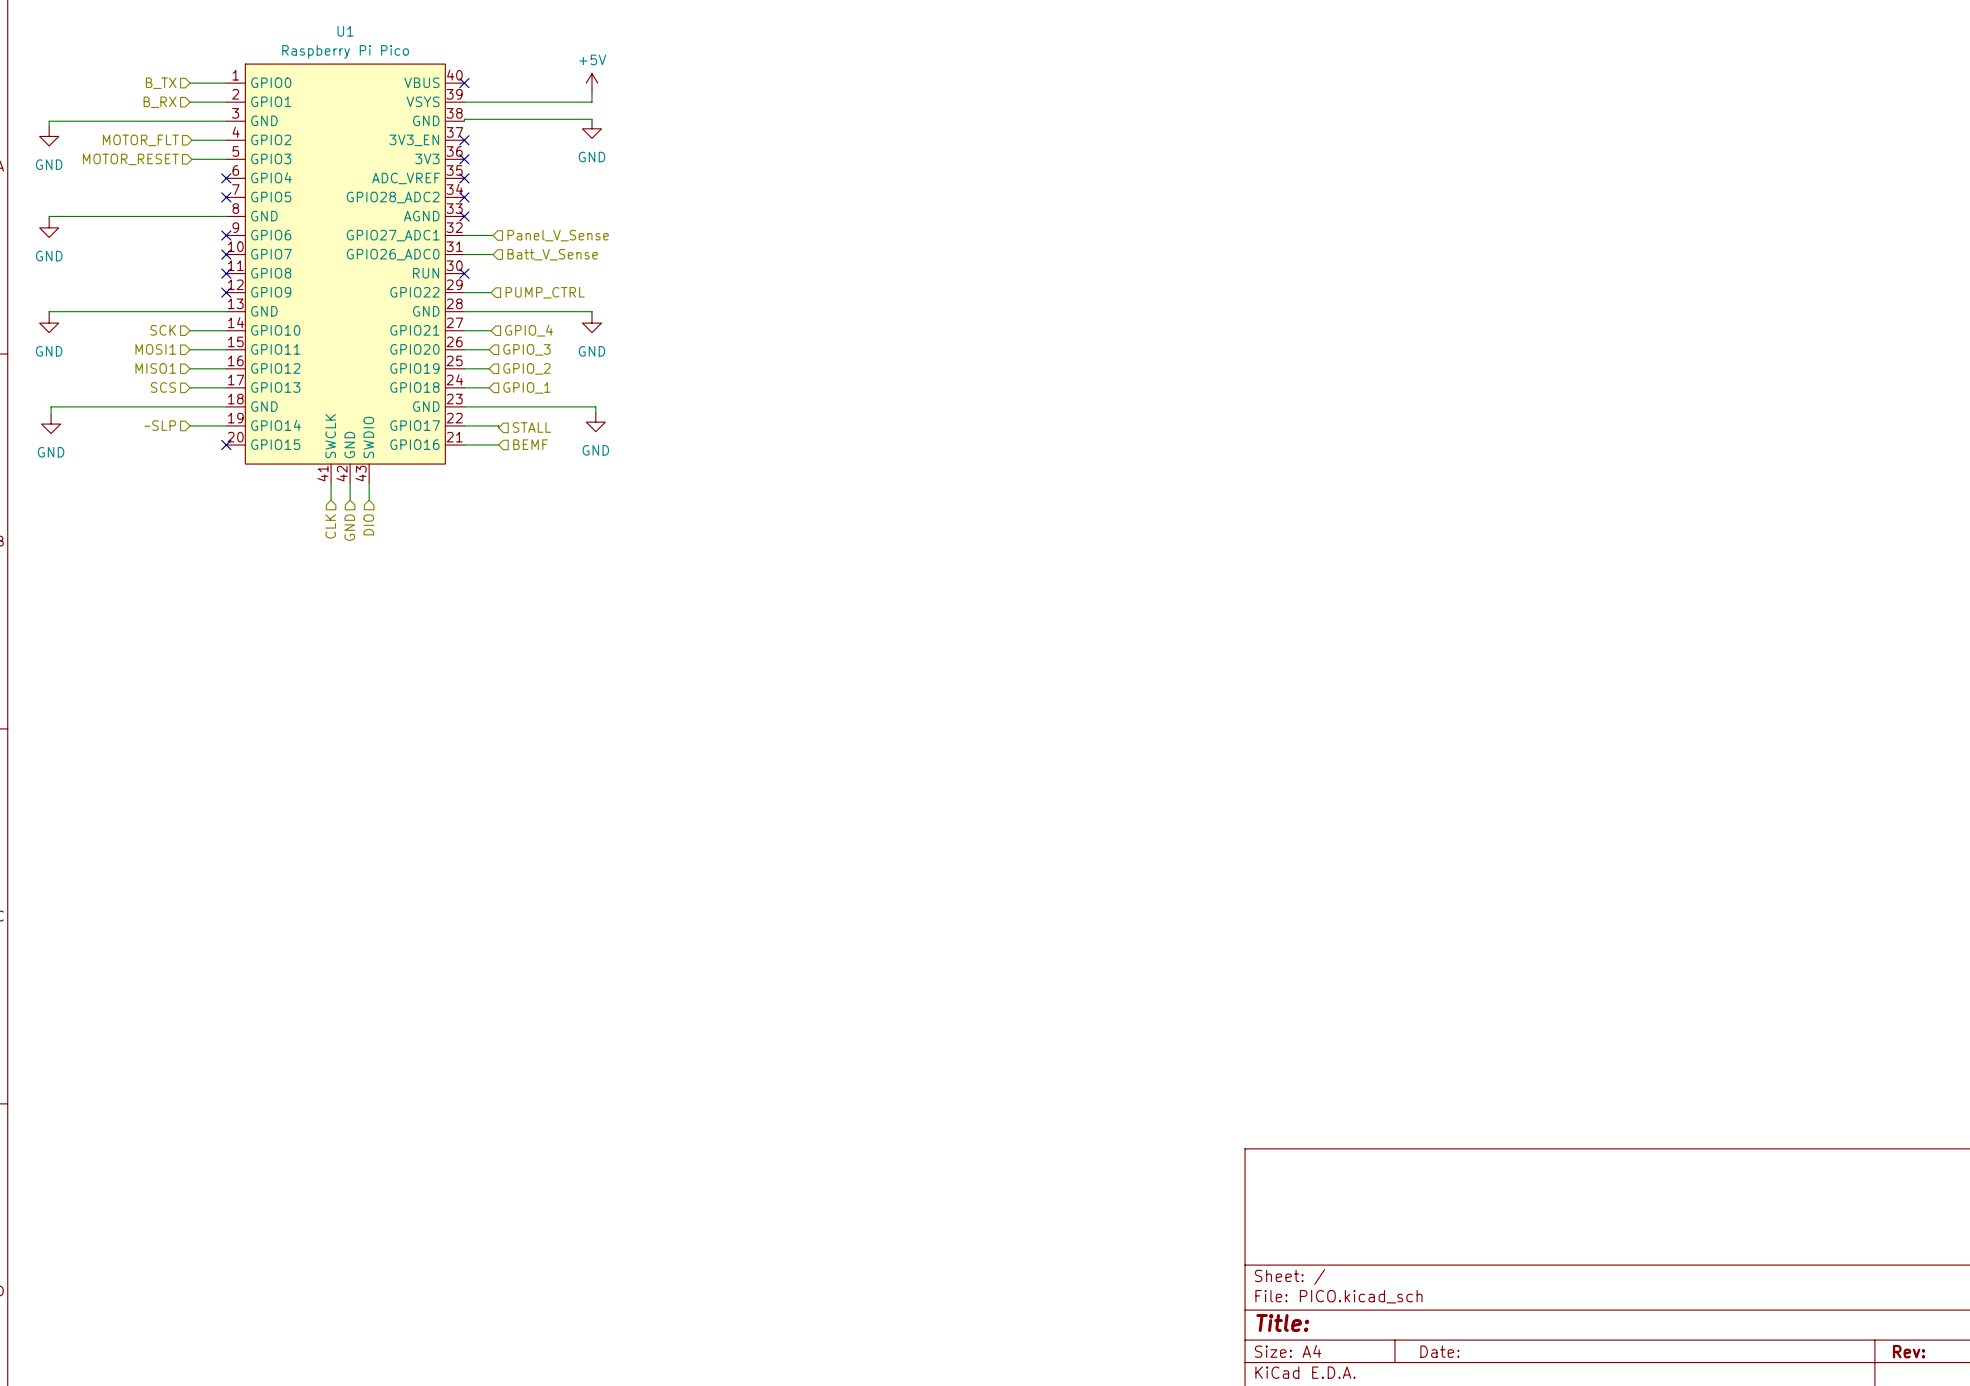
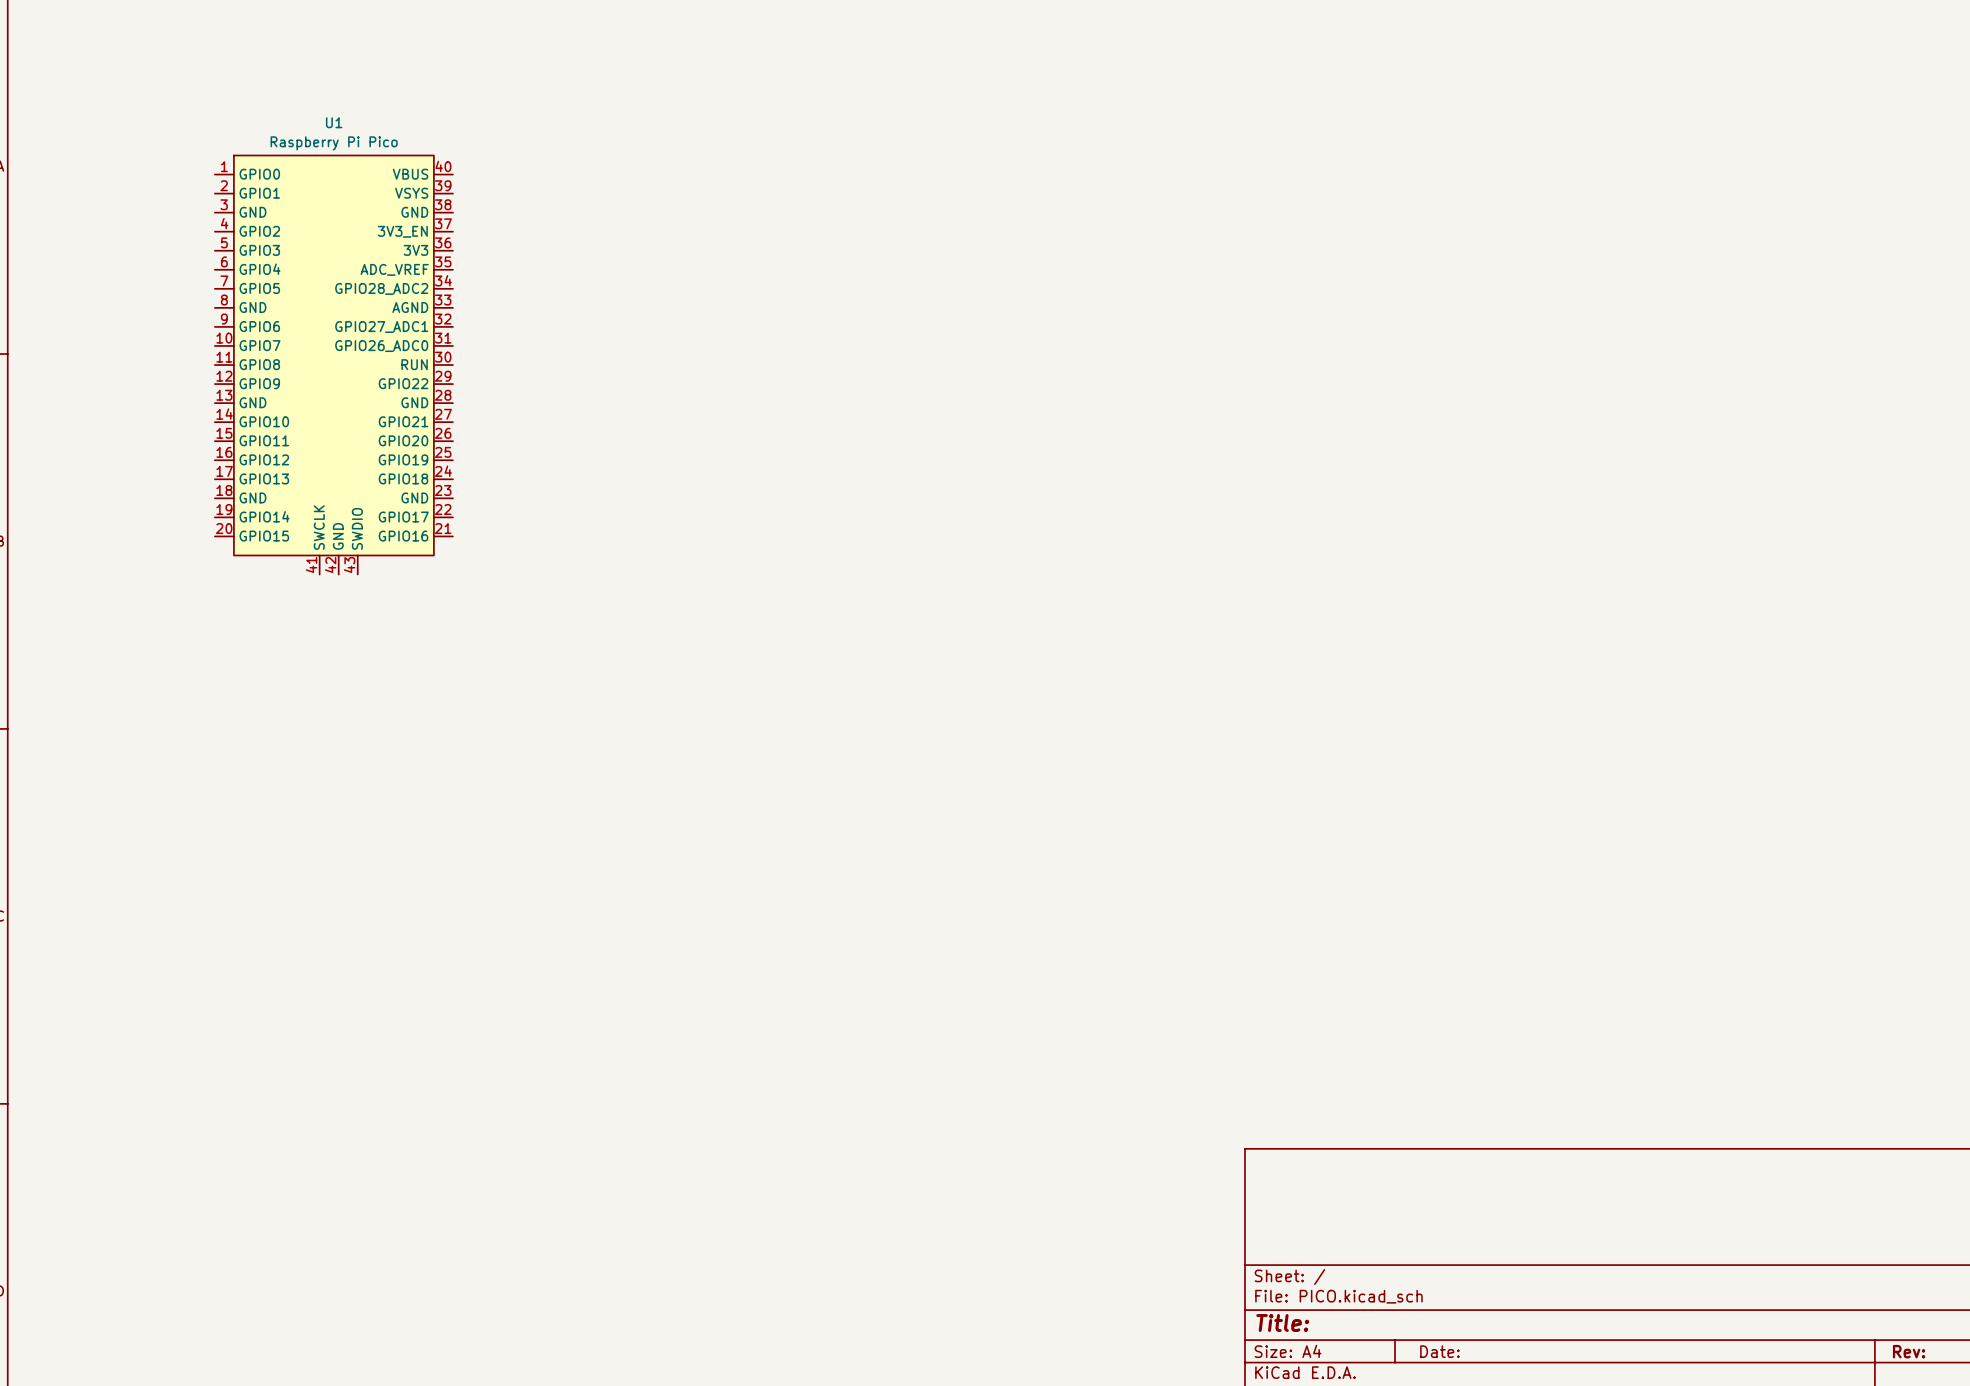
hierarchical label: B_TX (161, 83) -> none
wire: (190, 83) (226, 83) -> none
no-connect mark: (464, 83) -> none
power symbol: +5V (592, 83) -> none
wire: (592, 92) (592, 102) (464, 102) -> none
hierarchical label: B_RX (160, 102) -> none
wire: (190, 102) (226, 102) -> none
wire: (592, 119) (464, 119) (464, 121) -> none
wire: (226, 121) (49, 121) (49, 126) -> none
power symbol: GND (592, 128) -> none
power symbol: GND (49, 136) -> none
hierarchical label: MOTOR_FLT (140, 140) -> none
wire: (192, 140) (226, 140) -> none
no-connect mark: (464, 140) -> none
hierarchical label: MOTOR_RESET (130, 159) -> none
wire: (192, 159) (226, 159) -> none
no-connect mark: (464, 159) -> none
no-connect mark: (226, 178) -> none
no-connect mark: (464, 178) -> none
no-connect mark: (226, 197) -> none
no-connect mark: (464, 197) -> none
wire: (226, 216) (49, 216) (49, 218) -> none
no-connect mark: (464, 216) -> none
power symbol: GND (49, 227) -> none
no-connect mark: (226, 235) -> none
wire: (464, 235) (492, 235) -> none
hierarchical label: Panel_V_Sense (558, 235) -> none
no-connect mark: (226, 254) -> none
wire: (464, 254) (492, 254) -> none
hierarchical label: Batt_V_Sense (552, 254) -> none
no-connect mark: (226, 273) -> none
U1 position: (345, 273) -> (333, 365)
no-connect mark: (464, 273) -> none
no-connect mark: (226, 292) -> none
wire: (464, 292) (491, 292) -> none
hierarchical label: PUMP_CTRL (545, 292) -> none
wire: (226, 311) (49, 311) (49, 313) -> none
wire: (464, 311) (592, 311) (592, 313) -> none
power symbol: GND (49, 323) -> none
power symbol: GND (592, 323) -> none
hierarchical label: SCK (163, 330) -> none
wire: (190, 330) (226, 330) -> none
wire: (464, 330) (491, 330) -> none
hierarchical label: GPIO_4 (529, 330) -> none
hierarchical label: MOSI1 (155, 349) -> none
wire: (190, 349) (226, 349) -> none
wire: (464, 349) (489, 349) -> none
hierarchical label: GPIO_3 (526, 349) -> none
hierarchical label: MISO1 (155, 368) -> none
wire: (190, 368) (226, 368) -> none
wire: (464, 368) (489, 368) -> none
hierarchical label: GPIO_2 (526, 368) -> none
hierarchical label: SCS (163, 387) -> none
wire: (190, 387) (226, 387) -> none
wire: (464, 387) (489, 387) -> none
hierarchical label: GPIO_1 (526, 387) -> none
wire: (226, 406) (51, 406) (51, 414) -> none
wire: (464, 406) (595, 406) (595, 412) -> none
power symbol: GND (595, 422) -> none
power symbol: GND (51, 424) -> none
hierarchical label: ~SLP (160, 425) -> none
wire: (190, 425) (226, 425) -> none
wire: (464, 425) (498, 425) (498, 427) -> none
hierarchical label: STALL (531, 427) -> none
hierarchical label: BEMF (530, 444) -> none
no-connect mark: (226, 445) -> none
wire: (464, 445) (498, 445) -> none
hierarchical label: DIO (368, 524) -> none
hierarchical label: CLK (330, 526) -> none
hierarchical label: GND (349, 527) -> none

